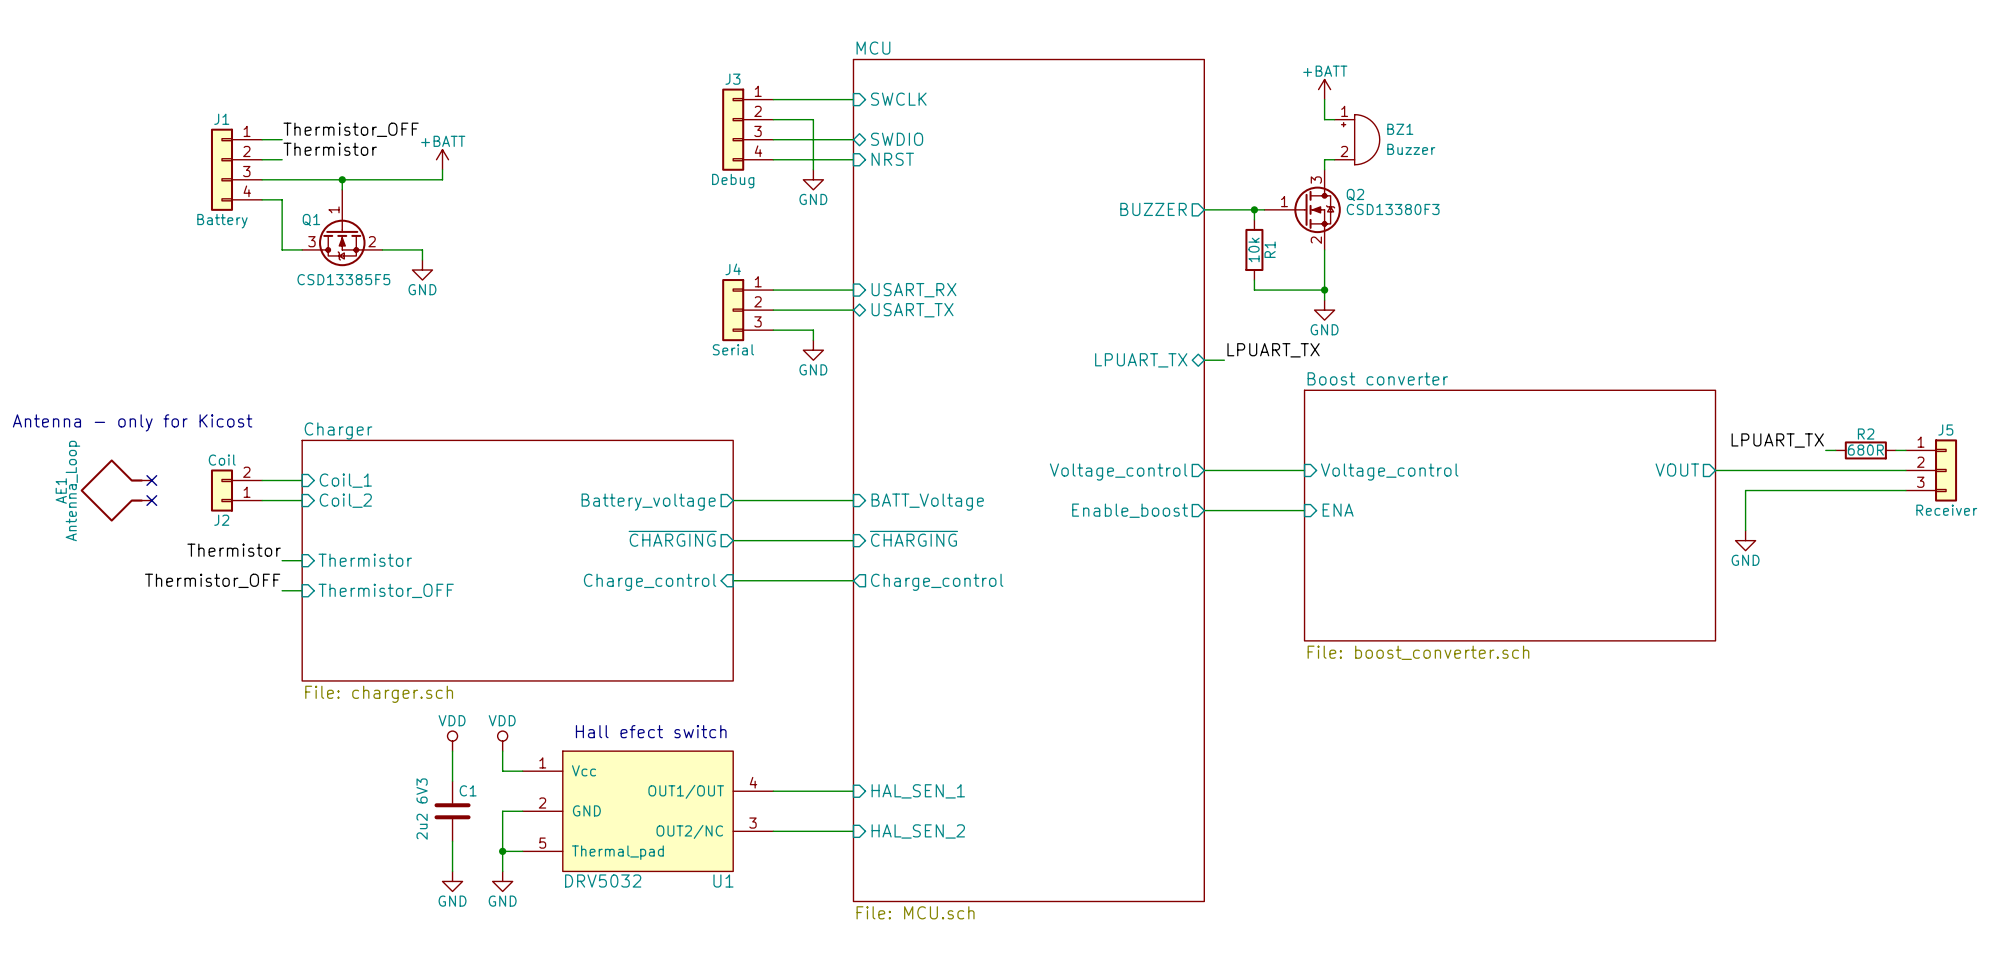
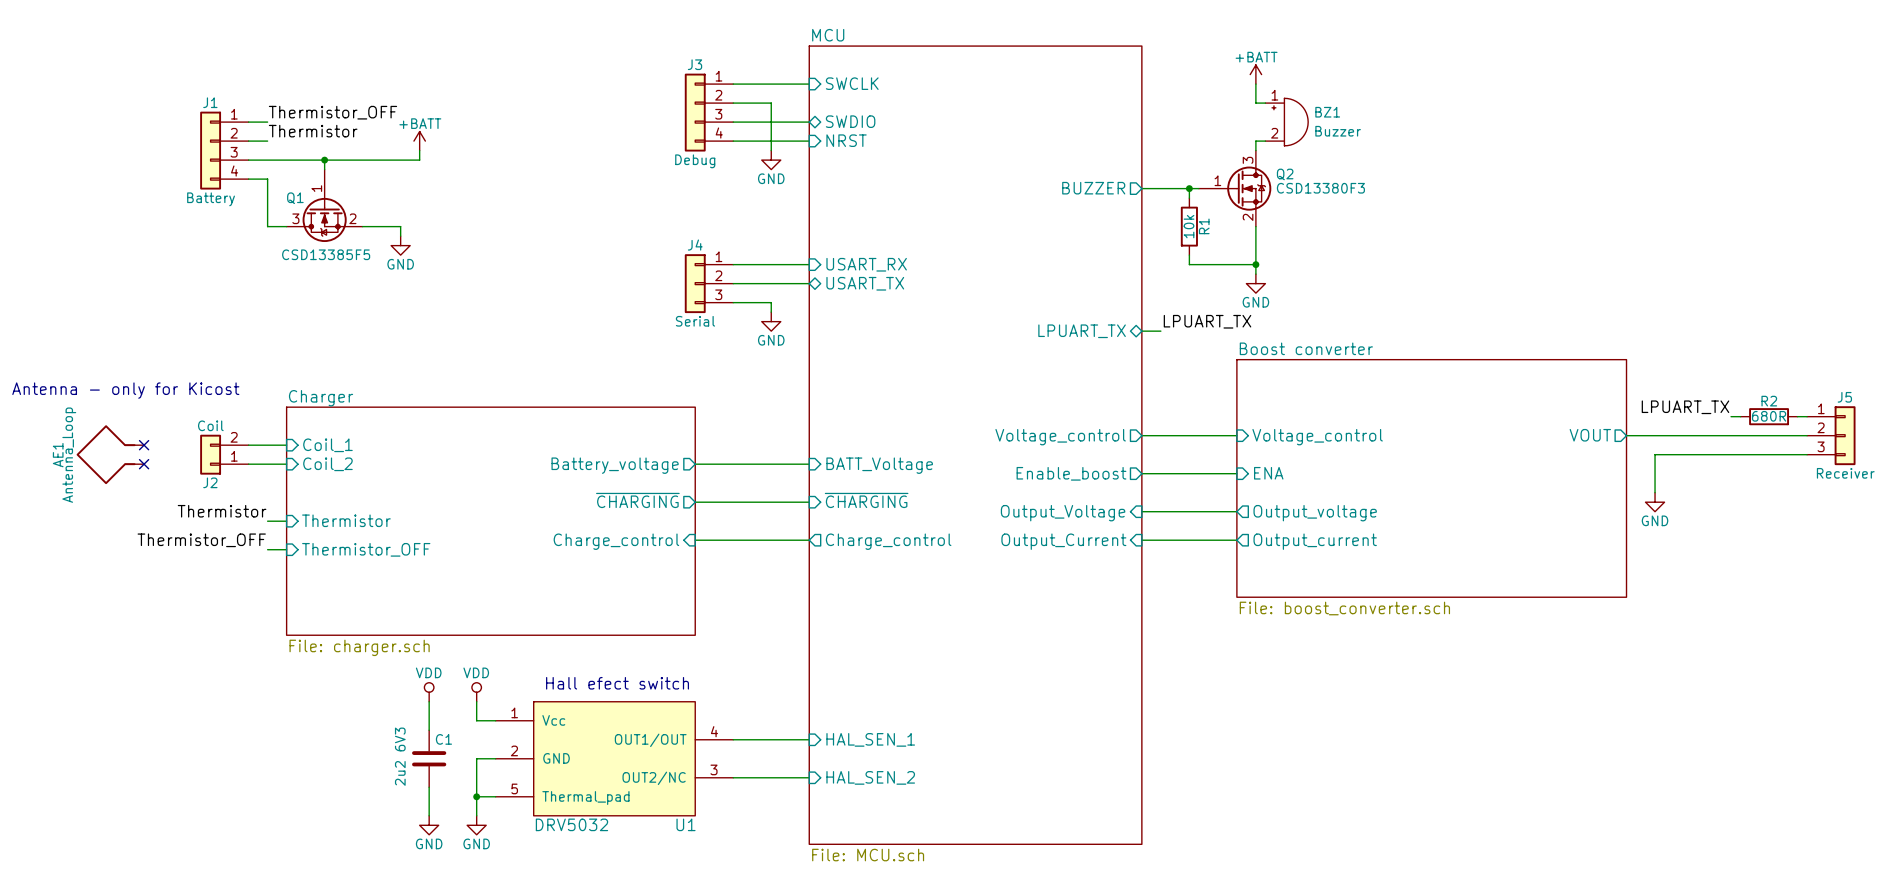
wire: none -> (1141, 511) (1236, 511)
sheet pin: none -> Output_Voltage (1063, 513)
sheet pin: none -> Output_voltage (1315, 513)
wire: none -> (1141, 540) (1236, 540)
sheet pin: none -> Output_Current (1063, 541)
sheet pin: none -> Output_current (1315, 541)

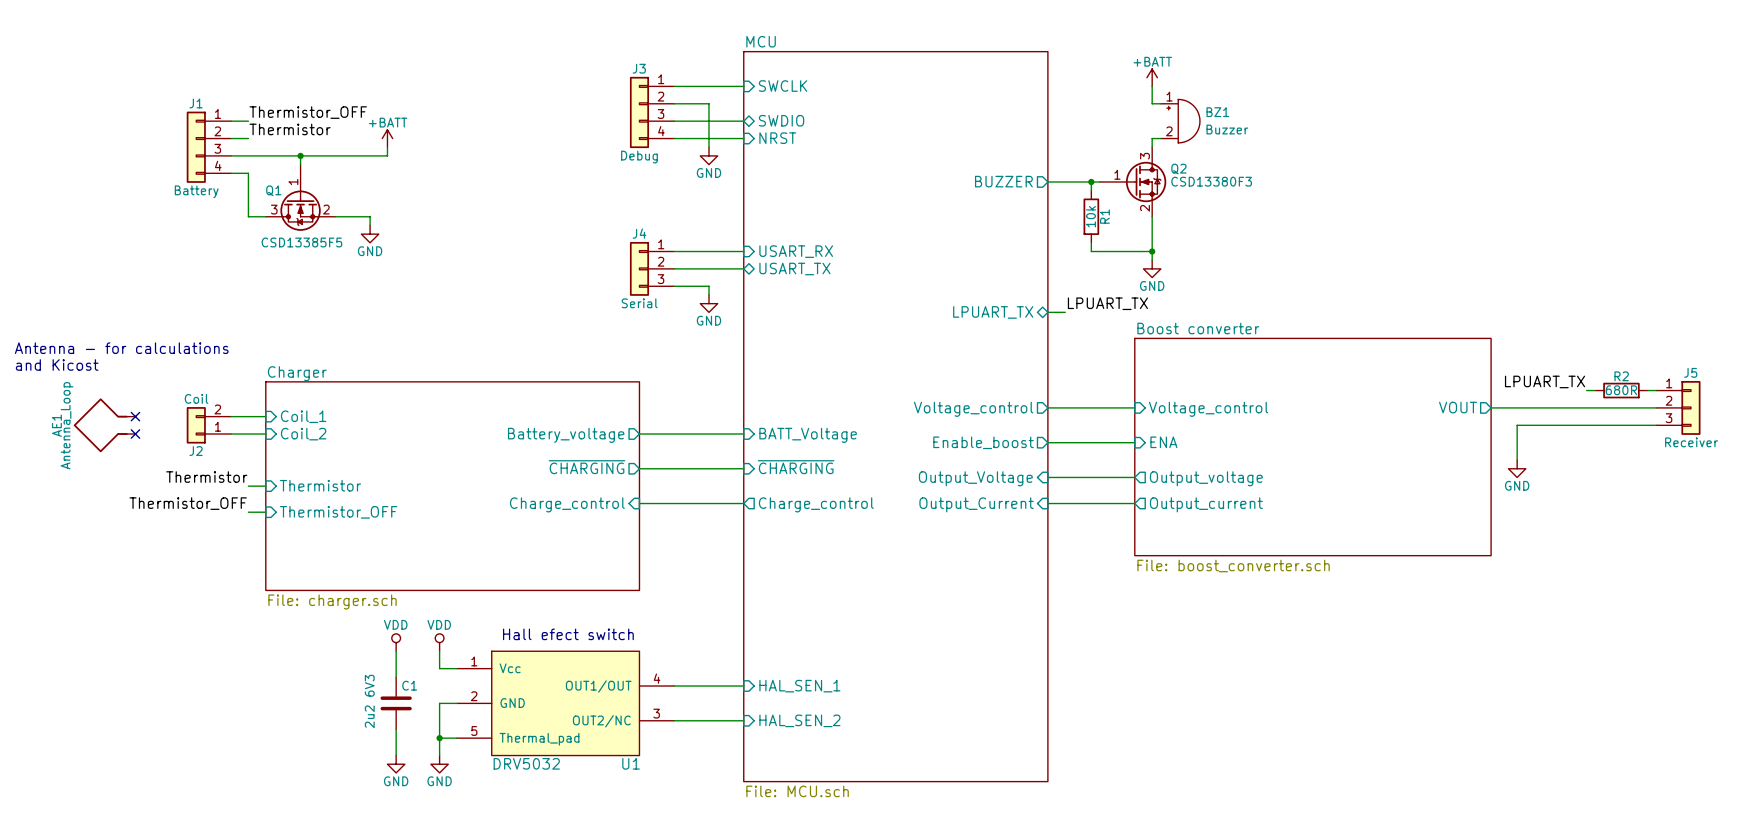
text: none -> Antenna - for calculations (121, 348)
text: Antenna - only for Kicost (125, 390) -> and Kicost (57, 364)

